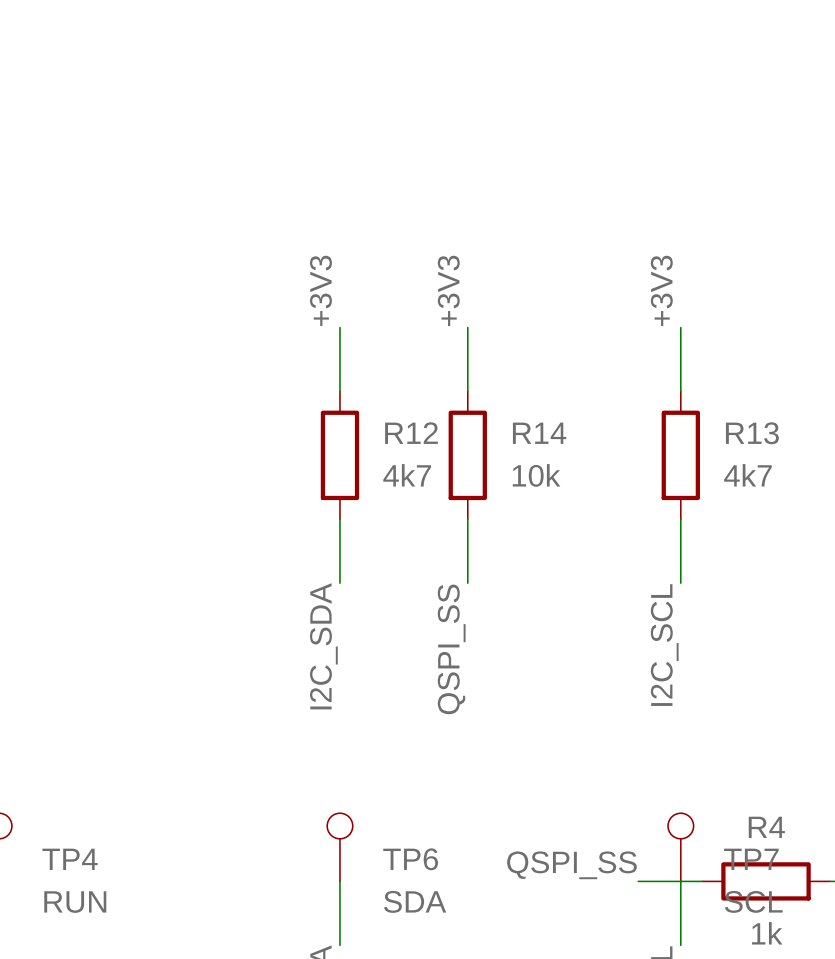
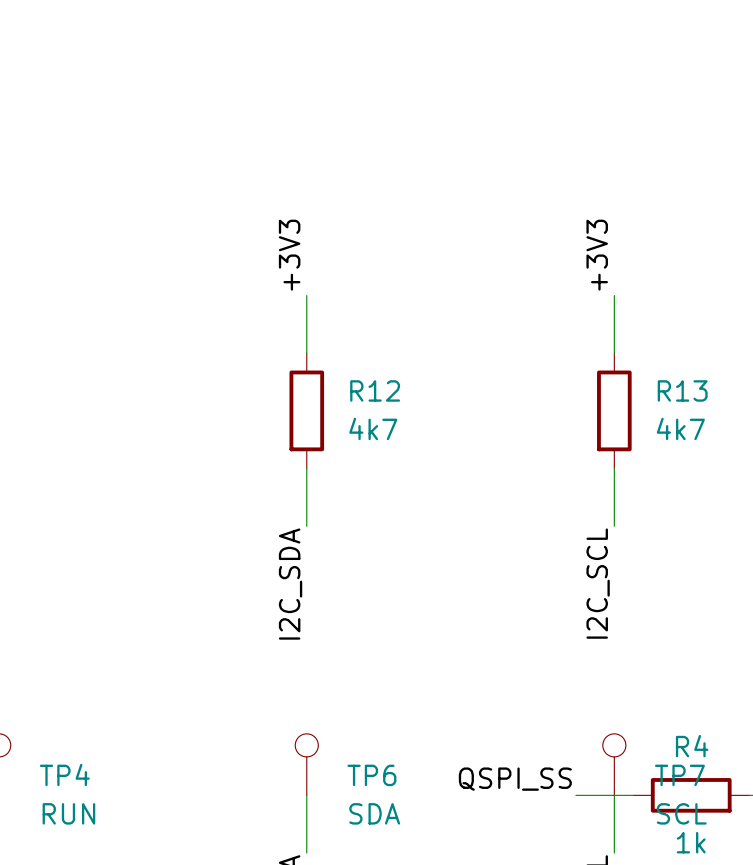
label: +3V3 (448, 290) -> none
wire: (467, 327) (467, 391) -> none
R14: 10k (467, 455) -> none
wire: (467, 519) (467, 583) -> none
label: QSPI_SS (451, 649) -> none

